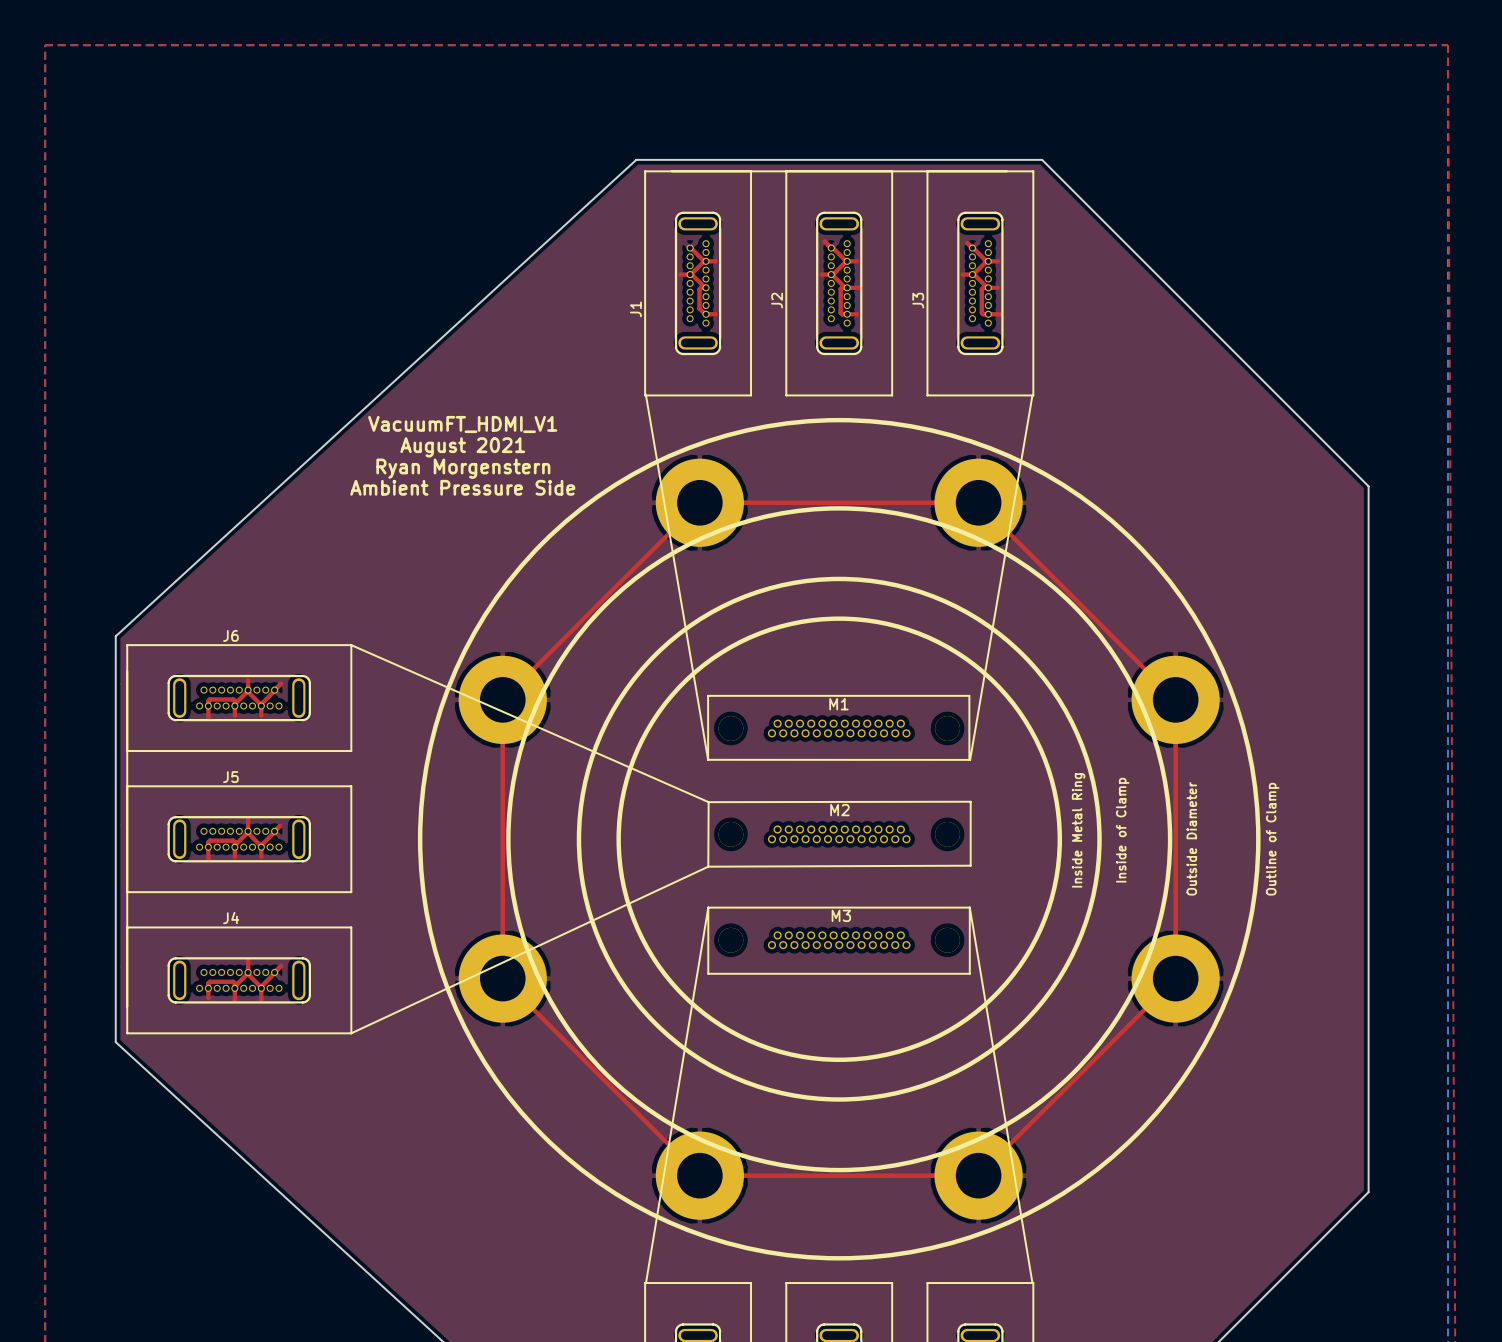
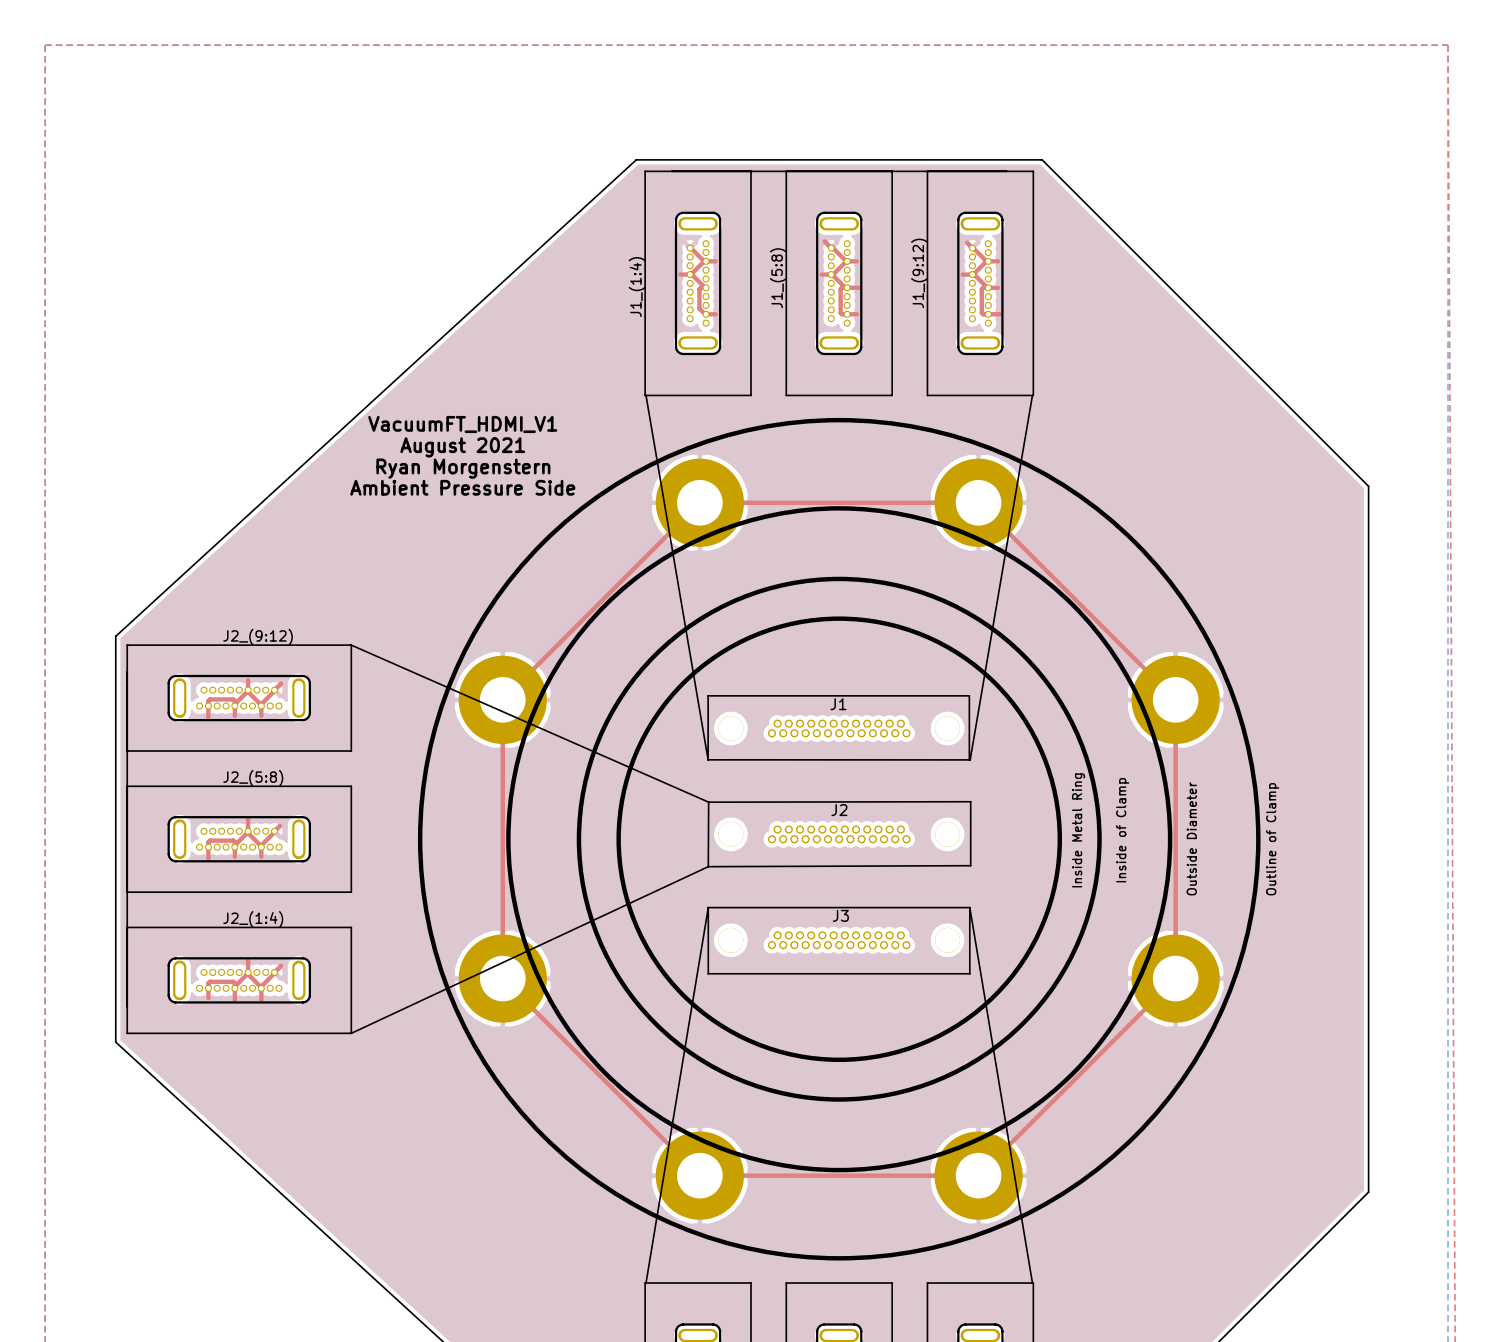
J2 name: J2 (777, 300) -> J1_(5:8) (778, 278)
J3 name: J3 (918, 300) -> J1_(9:12) (919, 273)
J1 name: J1 (635, 309) -> J1_(1:4) (637, 287)
J6 name: J6 (230, 635) -> J2_(9:12) (258, 637)
drawing shape: [829, 698, 849, 711] -> [830, 698, 847, 711]
J5 name: J5 (230, 777) -> J2_(5:8) (253, 778)
M2 name: M2 (839, 810) -> J2 (839, 810)
drawing shape: [831, 909, 851, 922] -> [832, 909, 849, 922]
J4 name: J4 (231, 918) -> J2_(1:4) (253, 919)

